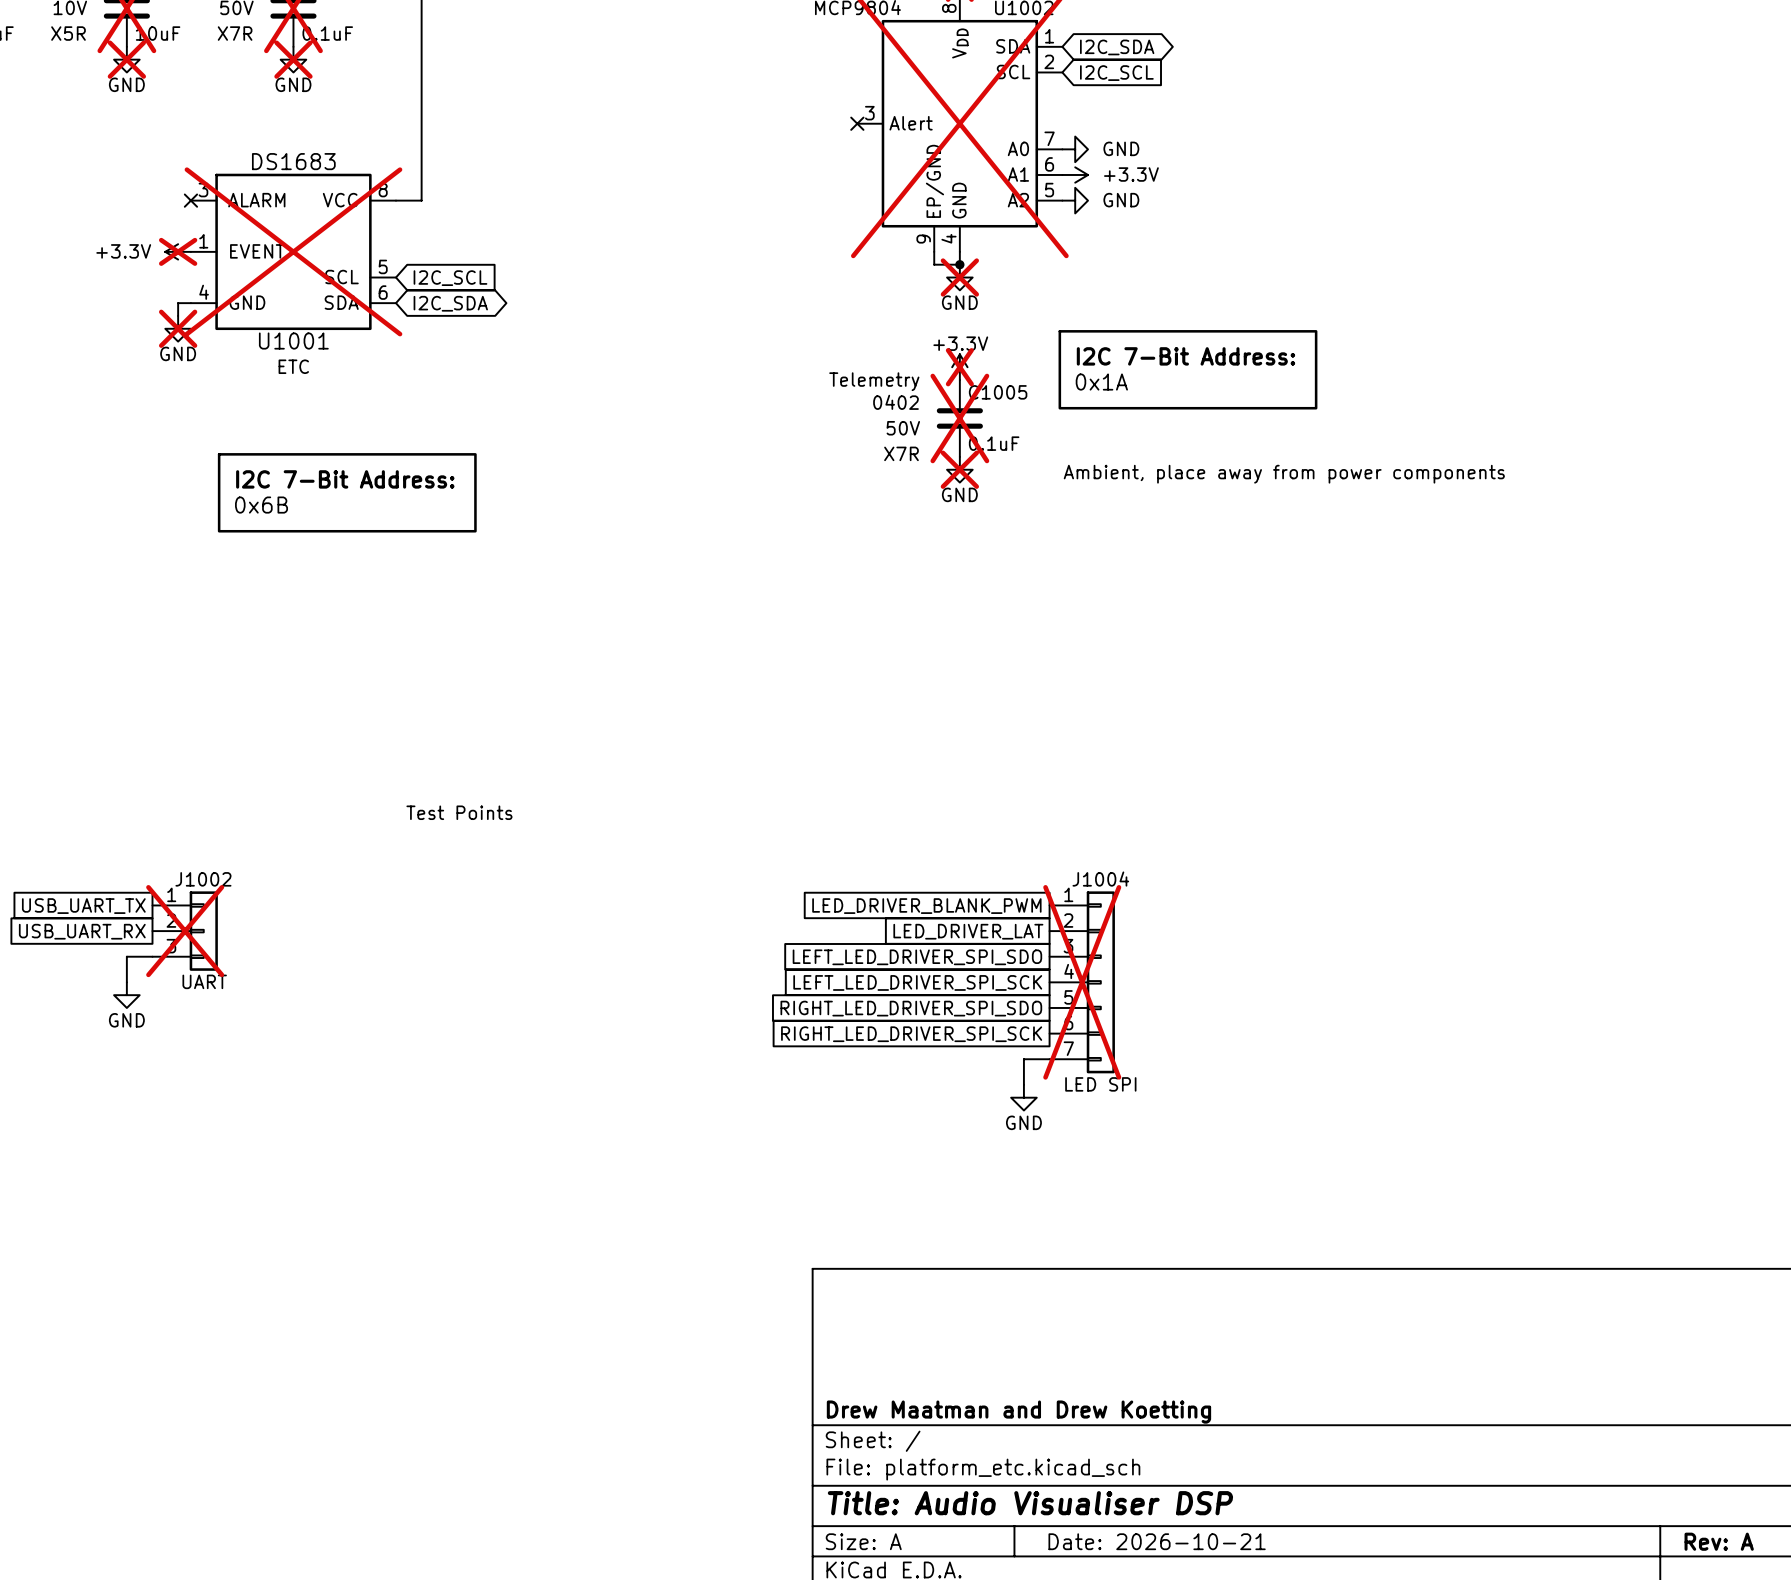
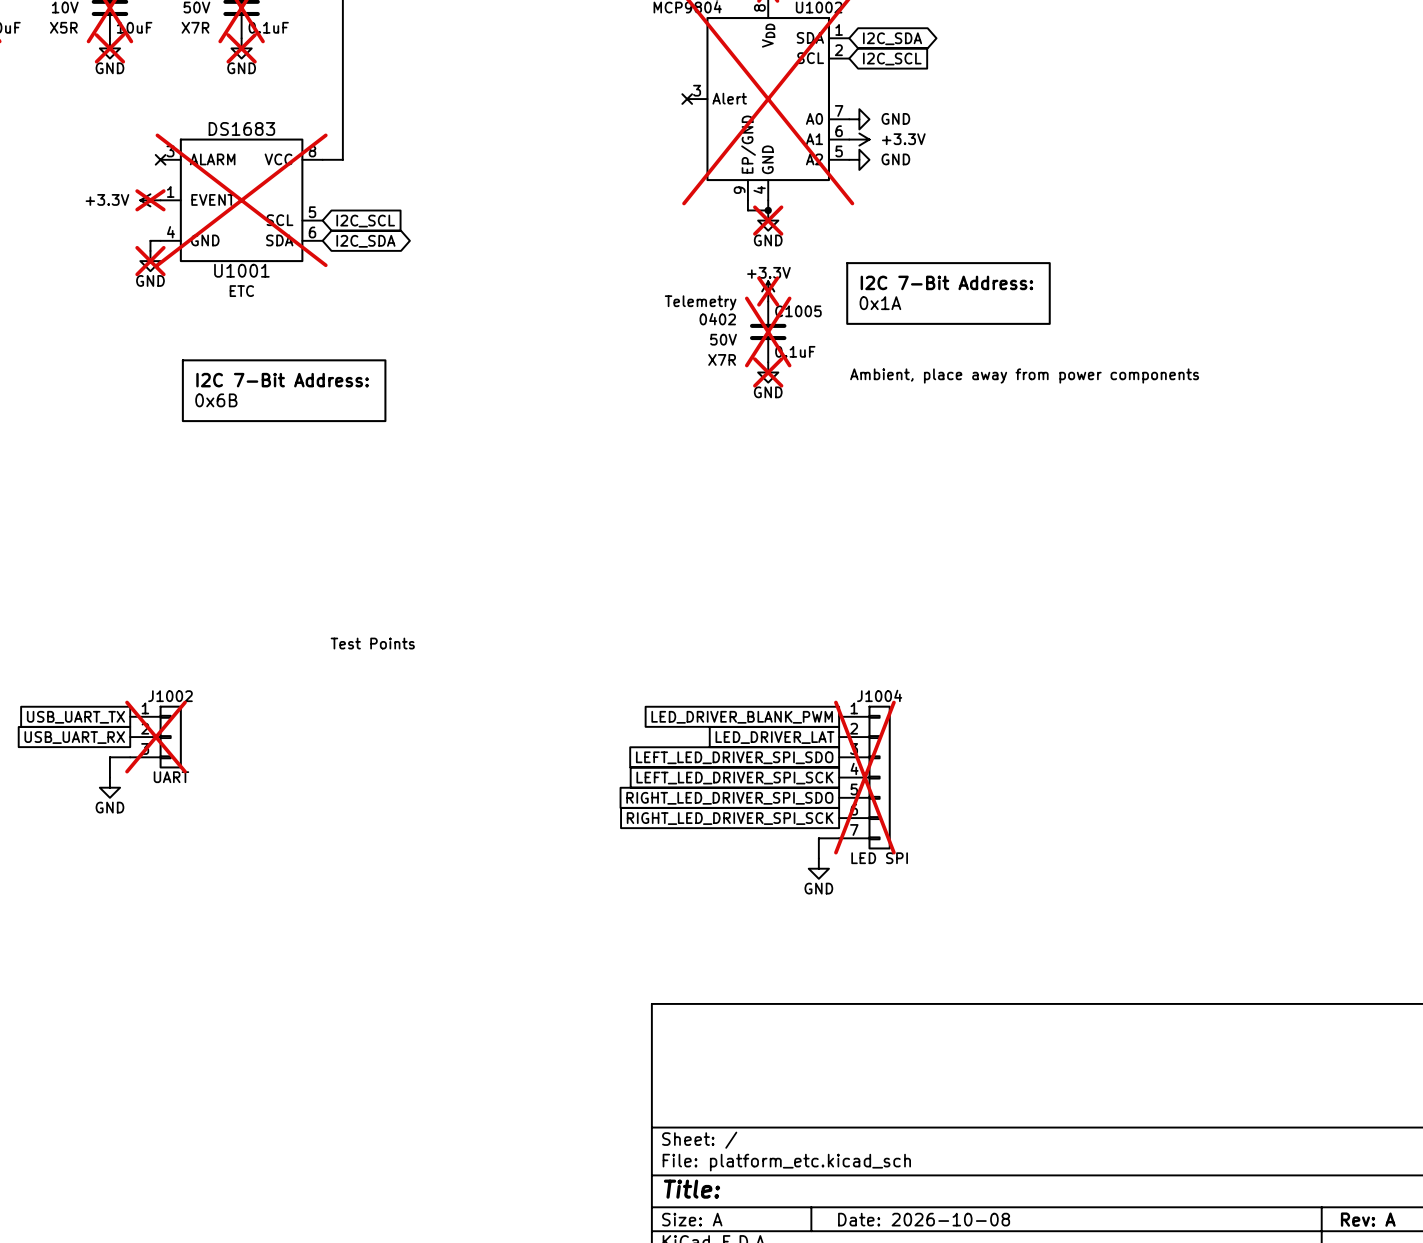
title block: Drew Maatman and Drew Koetting (1018, 1412) -> none
title block: Title: Audio Visualiser DSP (1030, 1503) -> Title: (692, 1189)
title block: Date: 2026-10-21 (1157, 1541) -> Date: 2026-10-08 (924, 1219)

